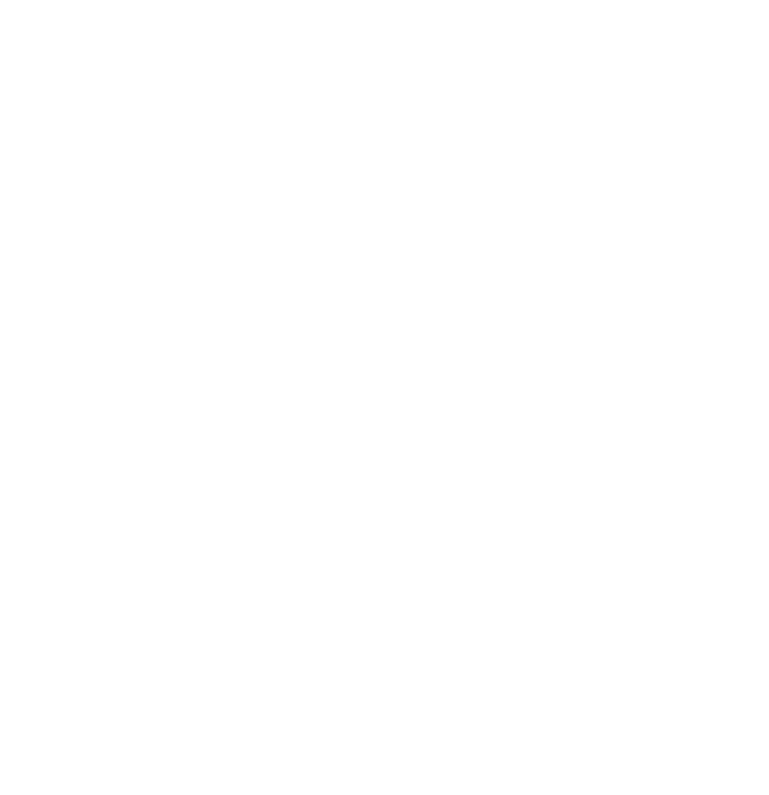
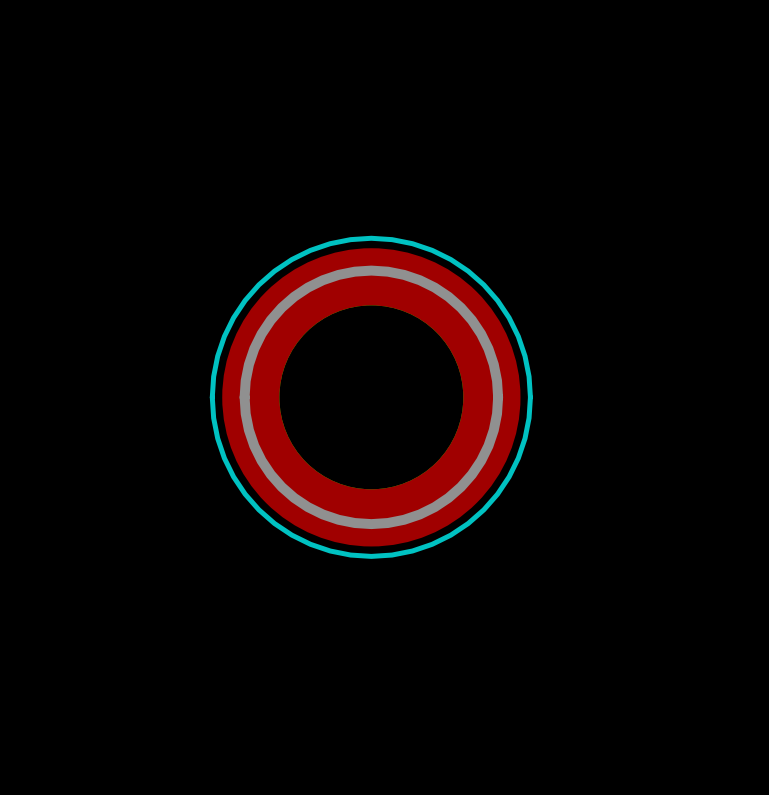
part: none -> (371, 397)

